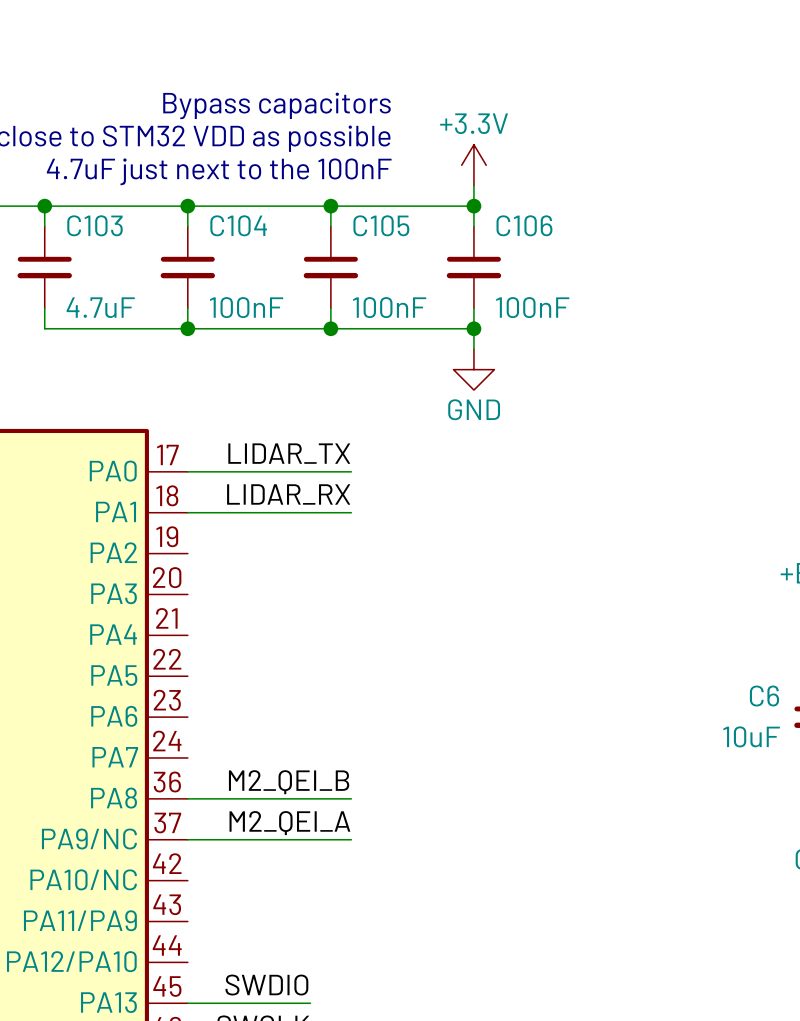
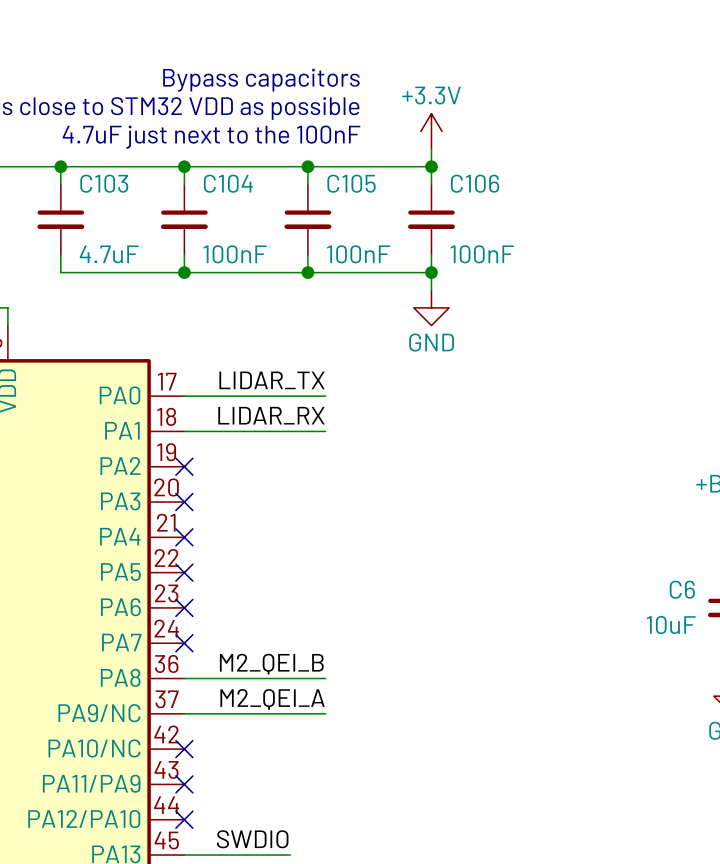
no-connect mark: none -> (184, 466)
no-connect mark: none -> (184, 502)
no-connect mark: none -> (184, 537)
no-connect mark: none -> (184, 572)
no-connect mark: none -> (184, 607)
no-connect mark: none -> (184, 643)
no-connect mark: none -> (184, 749)
no-connect mark: none -> (184, 784)
no-connect mark: none -> (184, 819)

